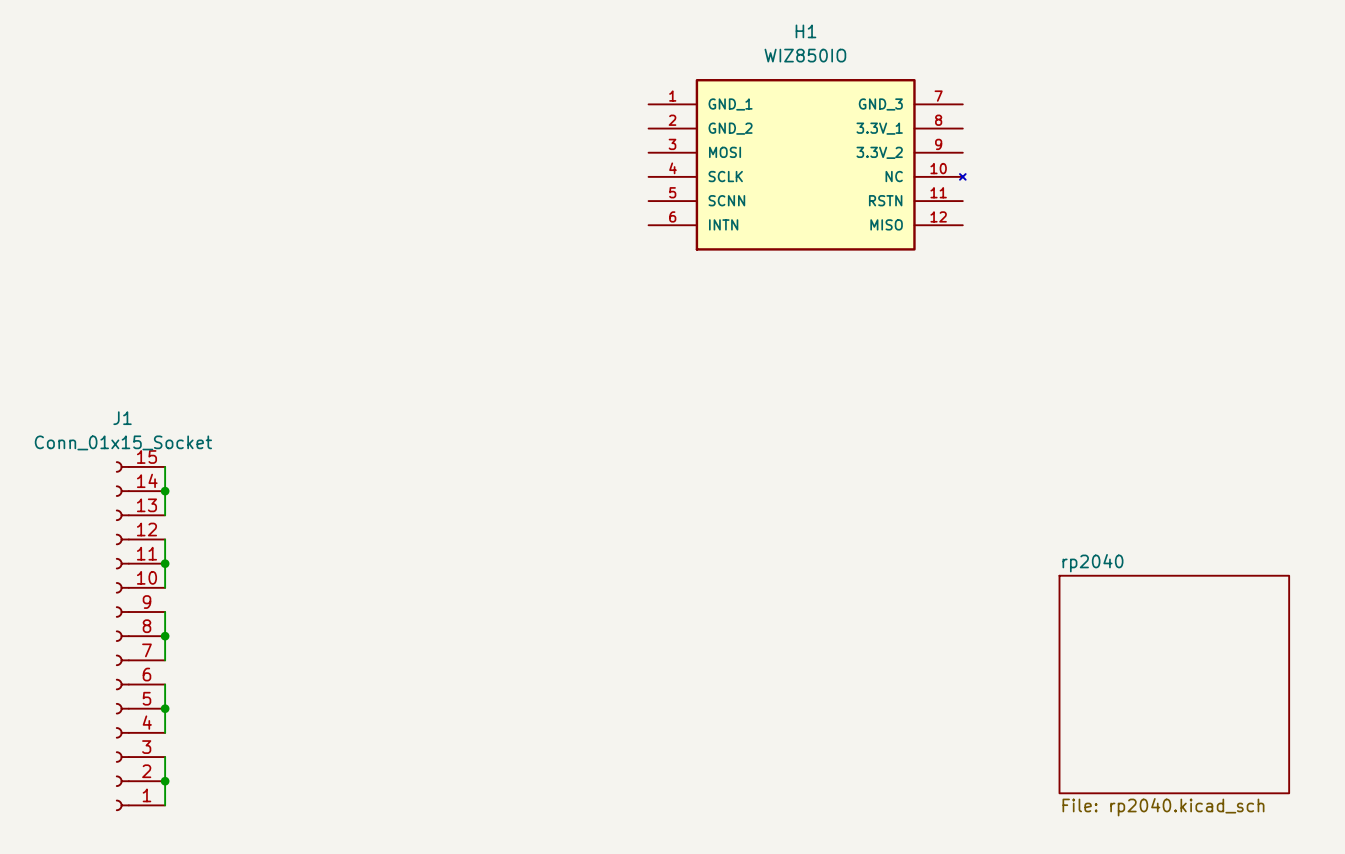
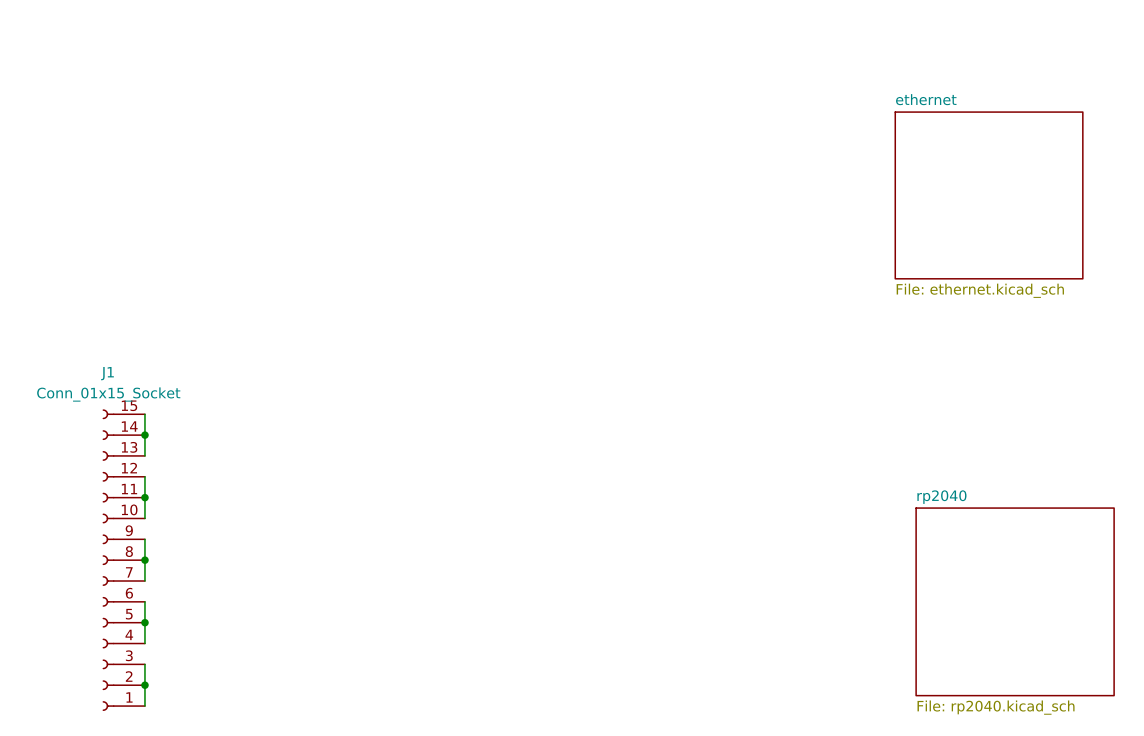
H1: WIZ850IO (807, 164) -> none
sheet ethernet: none -> File: ethernet.kicad_sch (989, 195)

